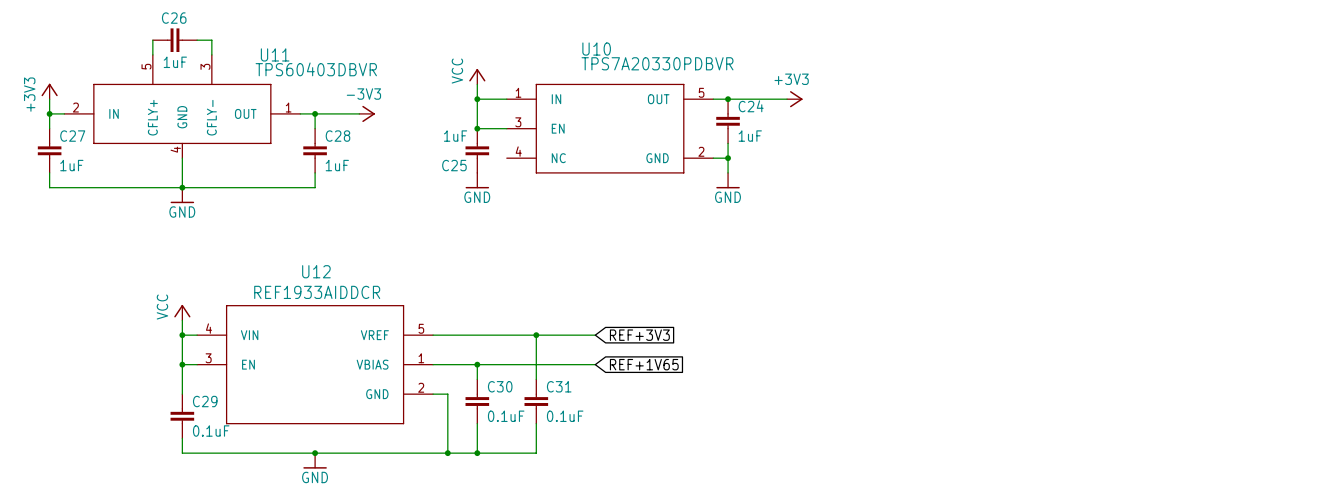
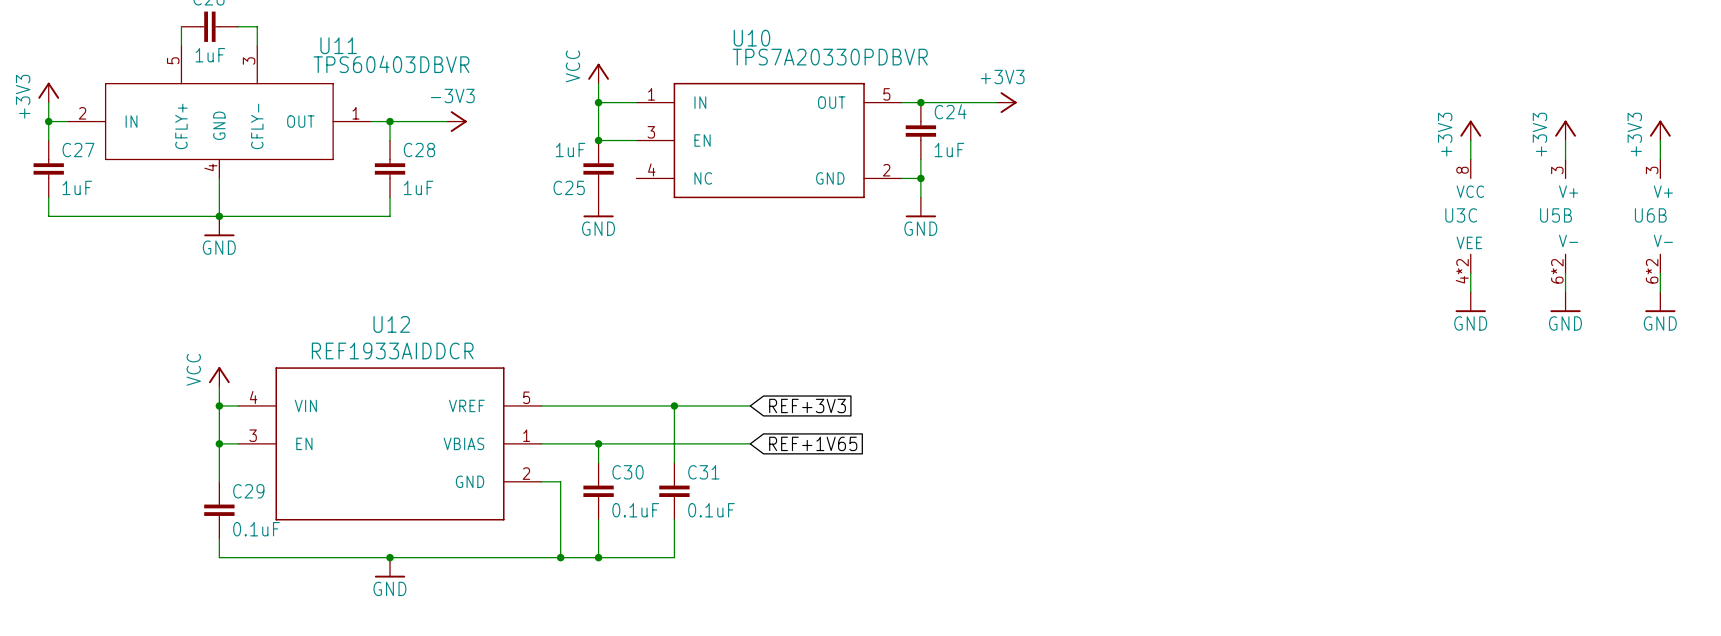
power symbol: none -> +3V3 (1470, 130)
power symbol: none -> +3V3 (1565, 130)
power symbol: none -> +3V3 (1660, 130)
wire: none -> (1470, 140) (1470, 159)
wire: none -> (1565, 140) (1565, 159)
wire: none -> (1660, 140) (1660, 159)
U3C: none -> (1470, 216)
U5B: none -> (1565, 216)
U6B: none -> (1660, 216)
wire: none -> (1470, 273) (1470, 292)
wire: none -> (1565, 273) (1565, 292)
wire: none -> (1660, 273) (1660, 292)
power symbol: none -> GND (1470, 302)
power symbol: none -> GND (1565, 302)
power symbol: none -> GND (1660, 302)

